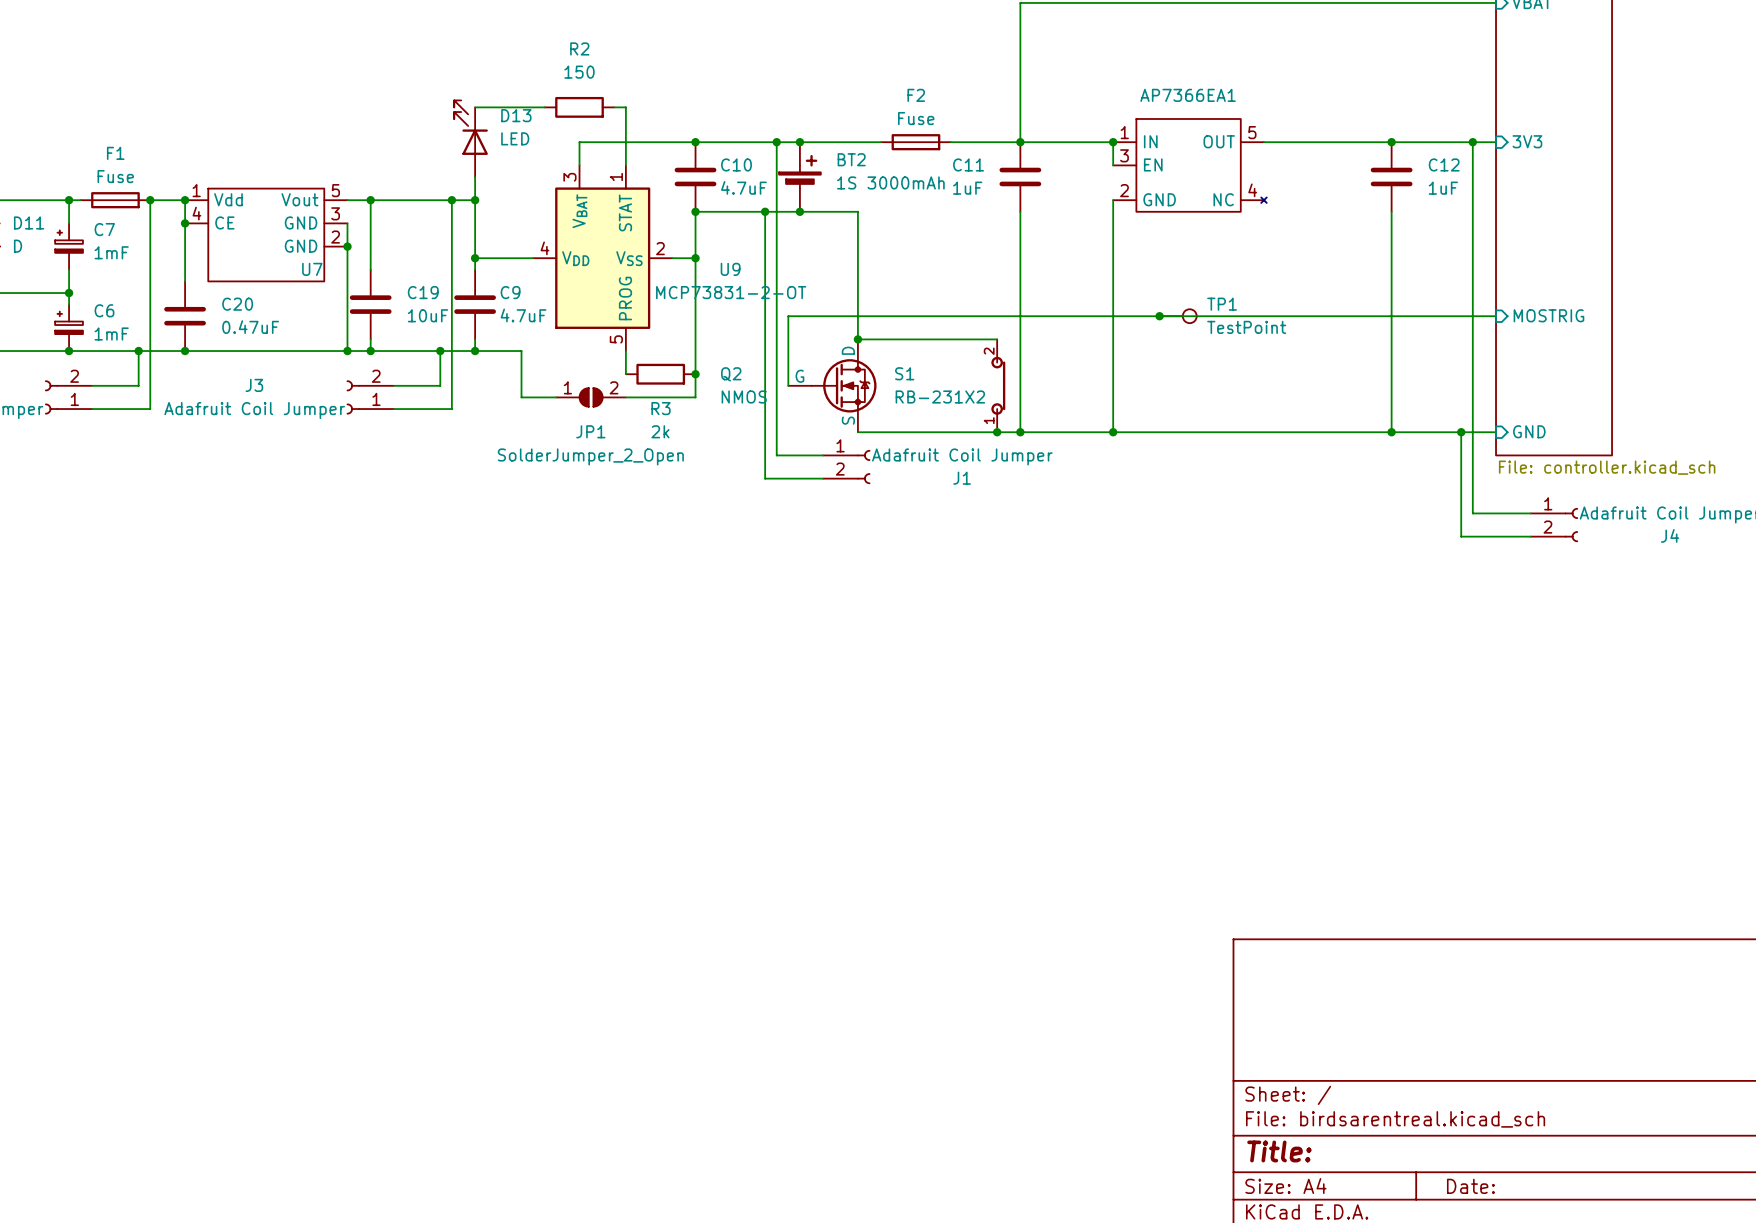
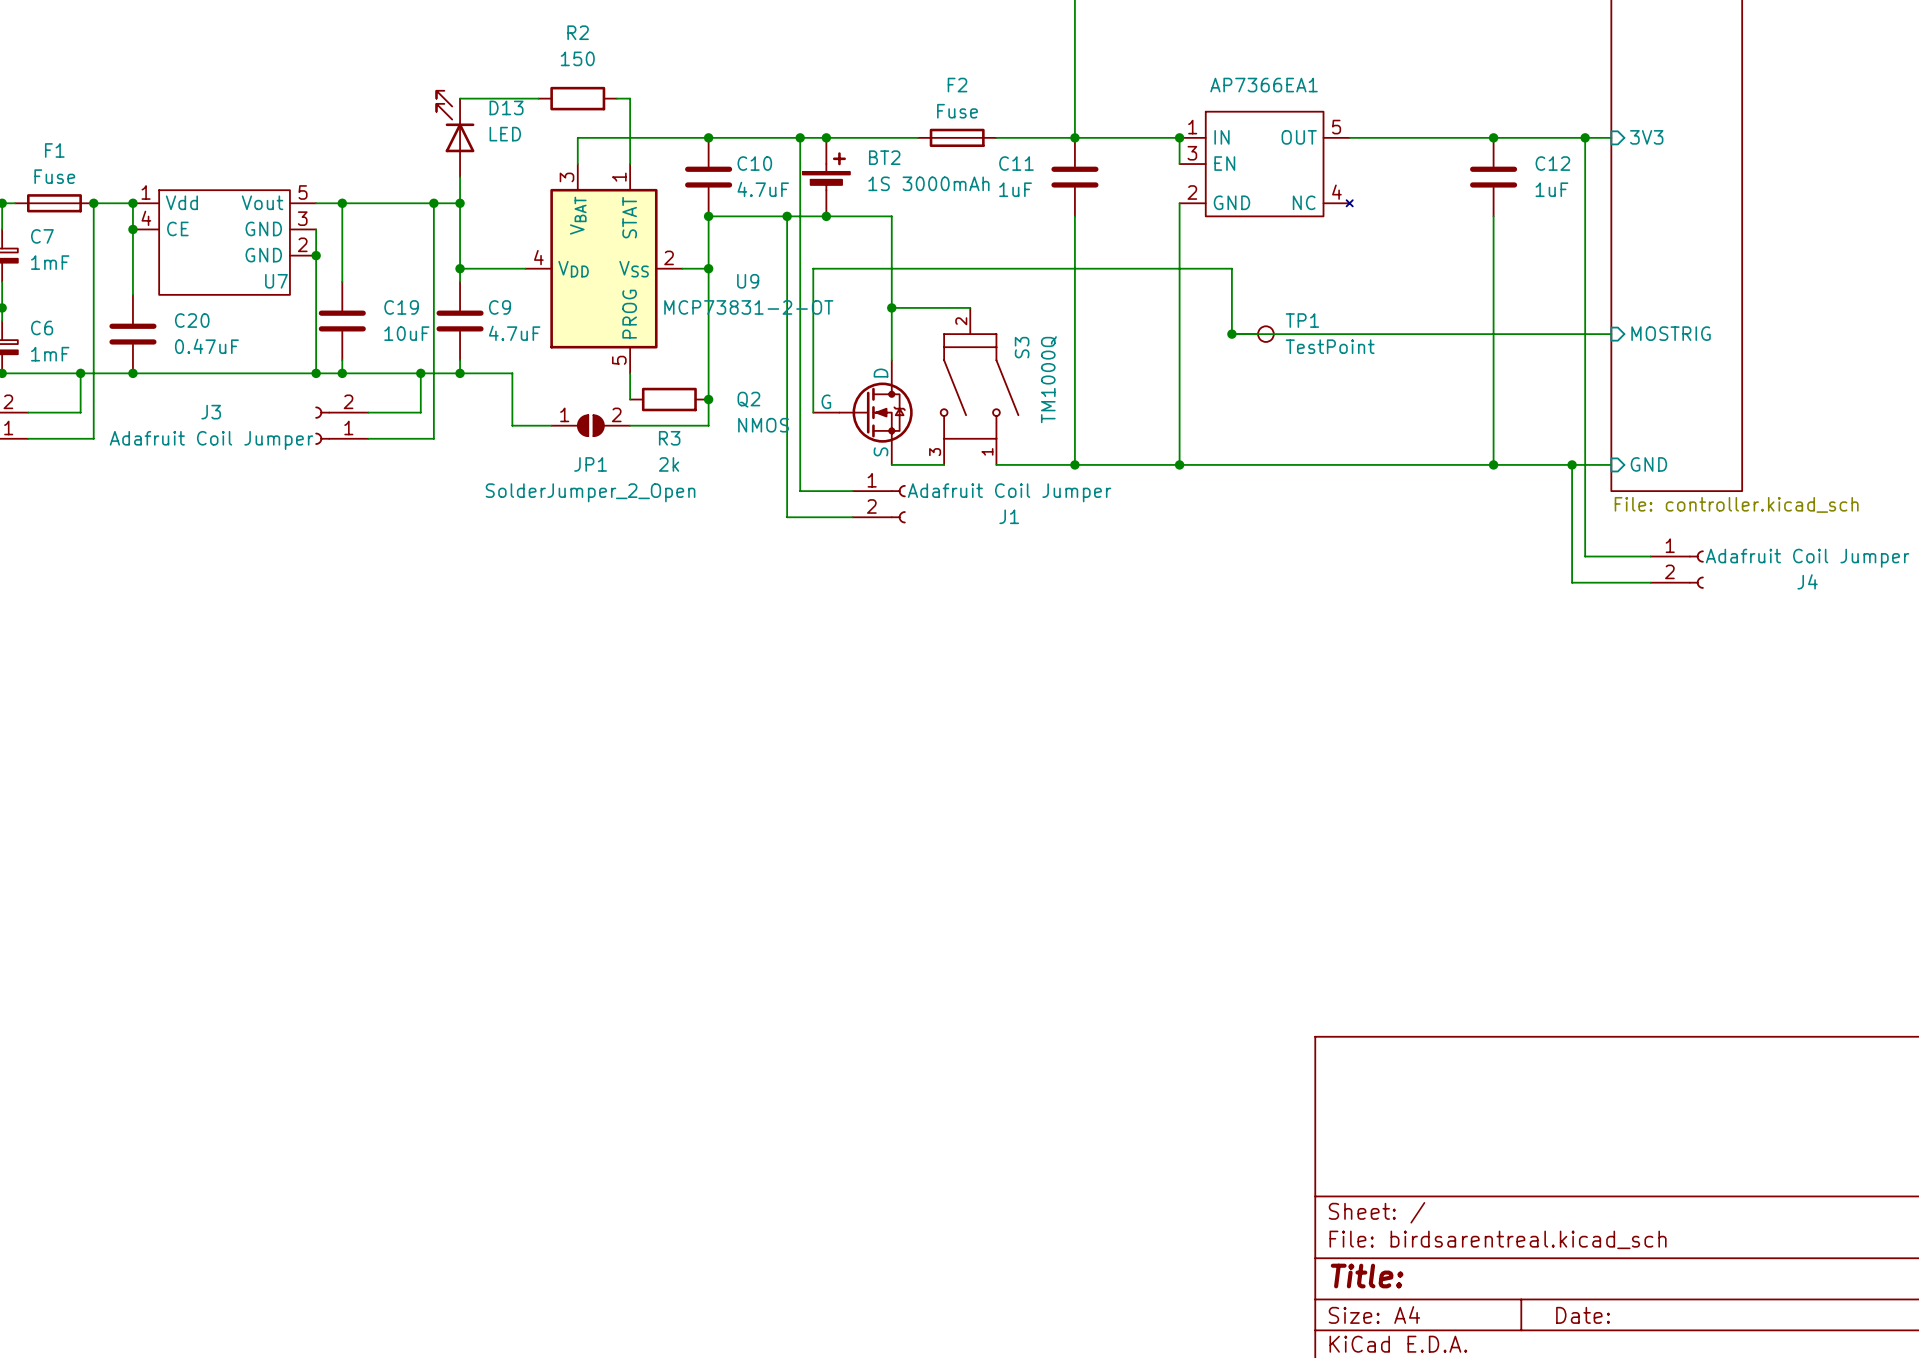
wire: none -> (891, 307) (970, 307)
wire: (788, 316) (1159, 316) -> (813, 334) (813, 268) (1231, 268) (1231, 334)
wire: (857, 339) (997, 339) -> none
junction position: (857, 339) -> (891, 307)
S3: none -> TM1000Q (979, 386)
S1: RB-231X2 (998, 385) -> none
wire: (904, 432) (950, 432) -> none
junction: (997, 432) -> none

